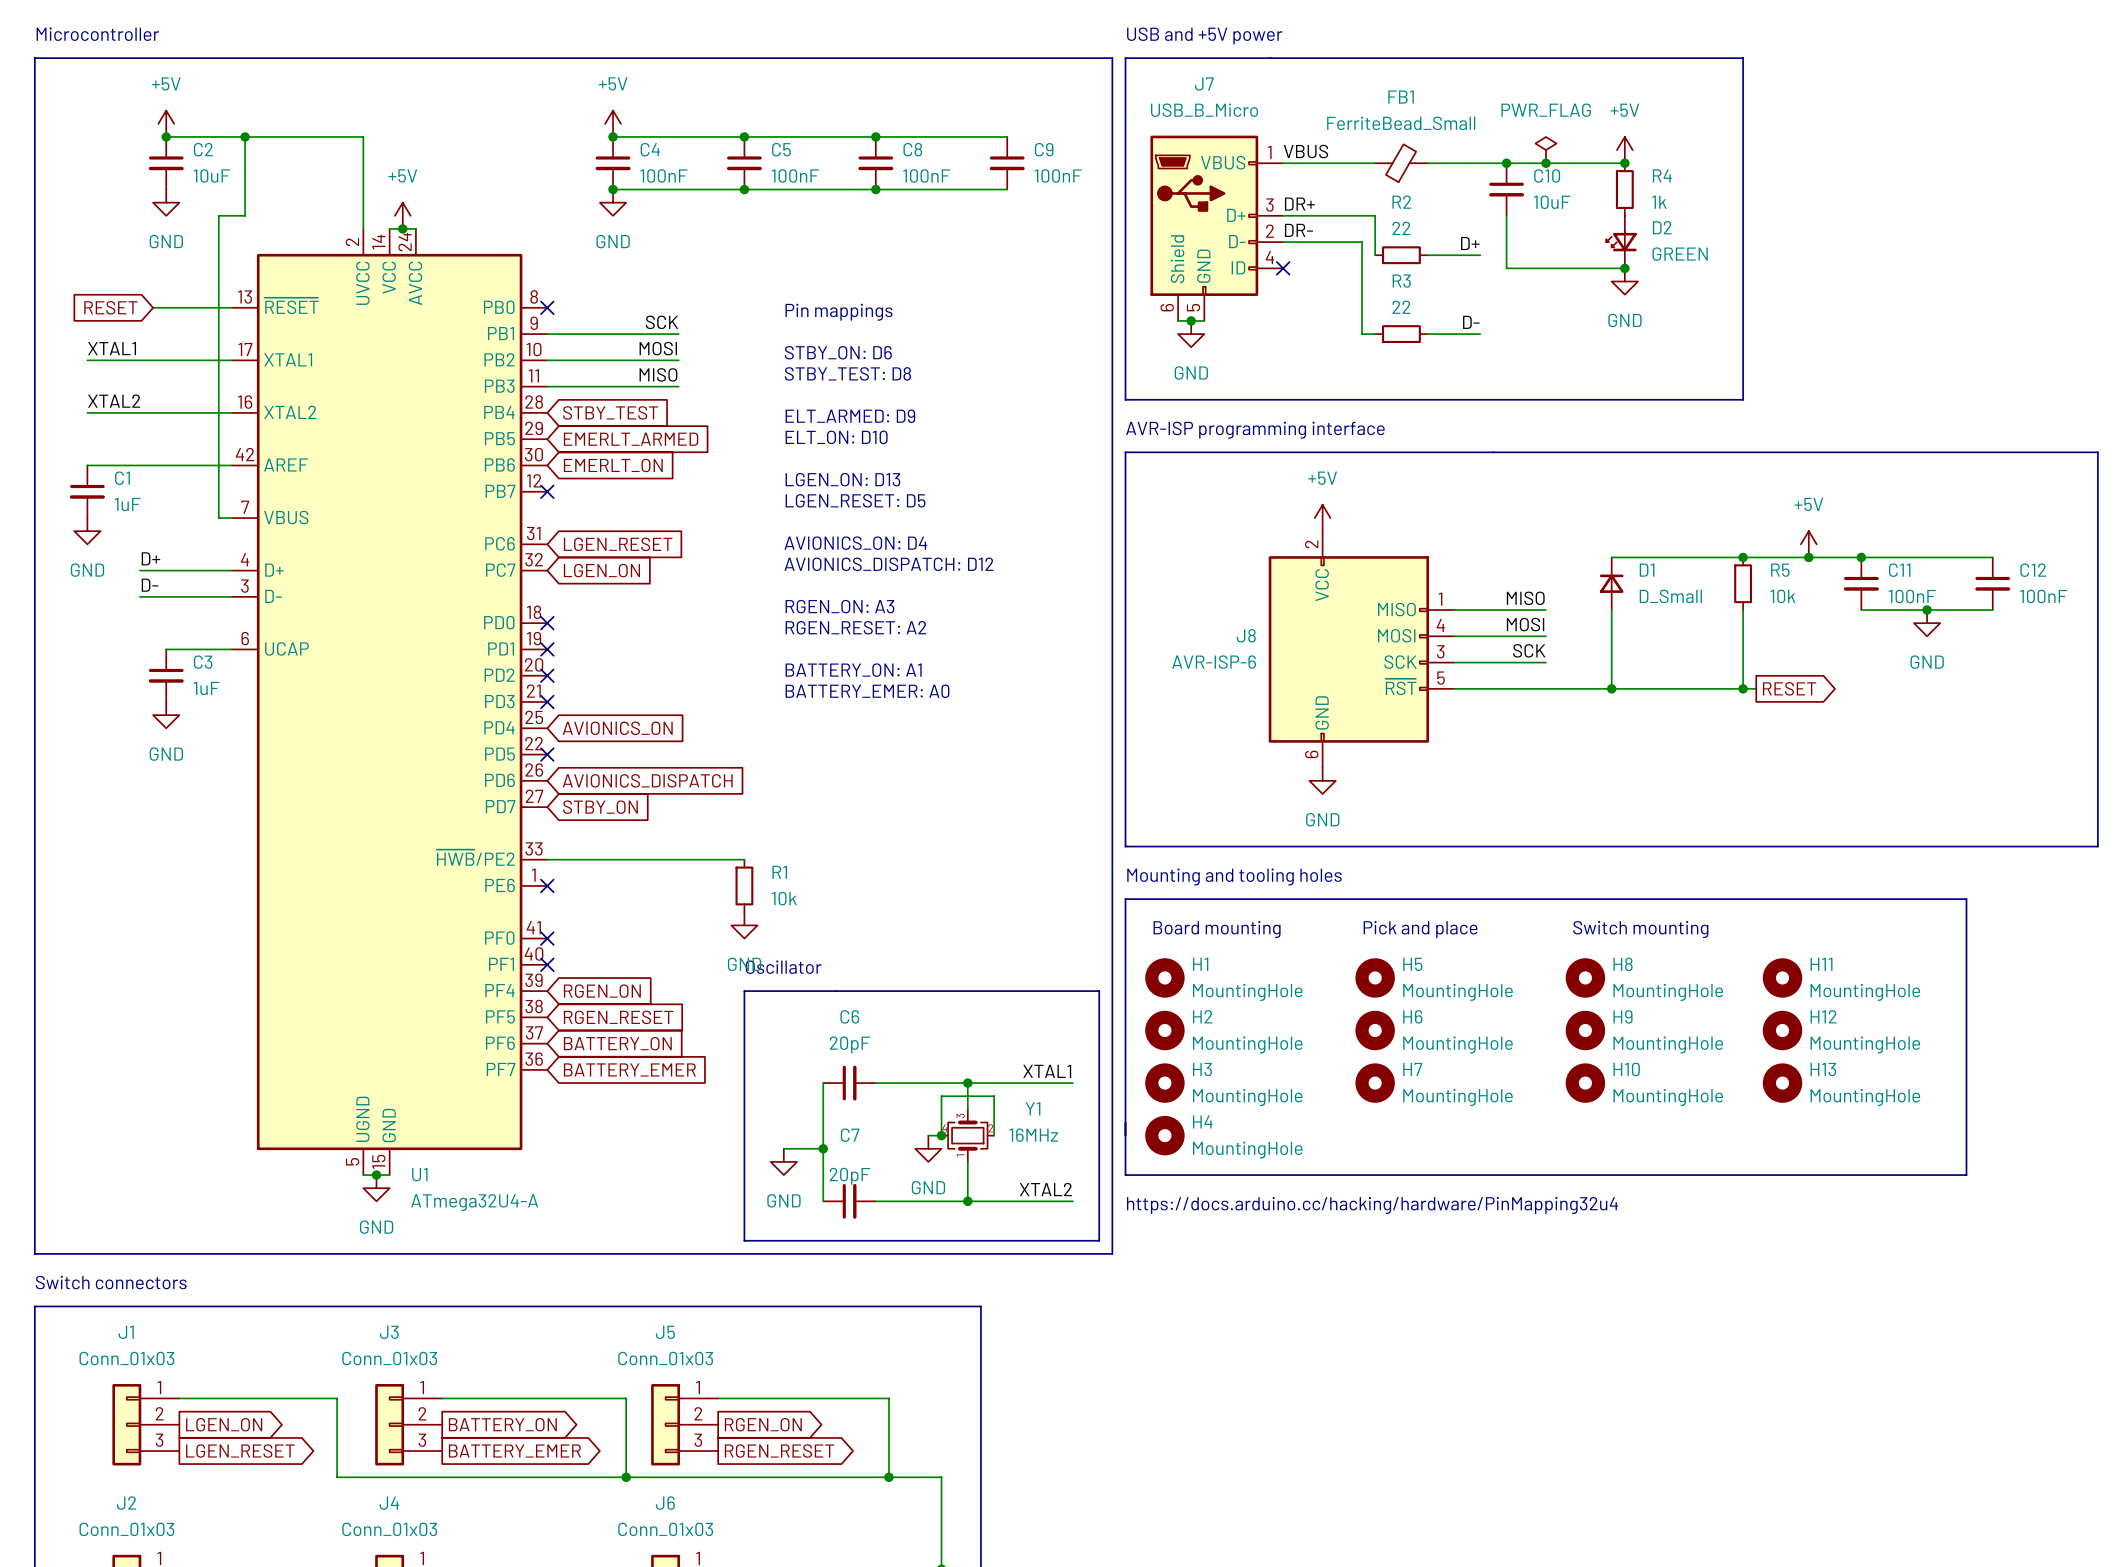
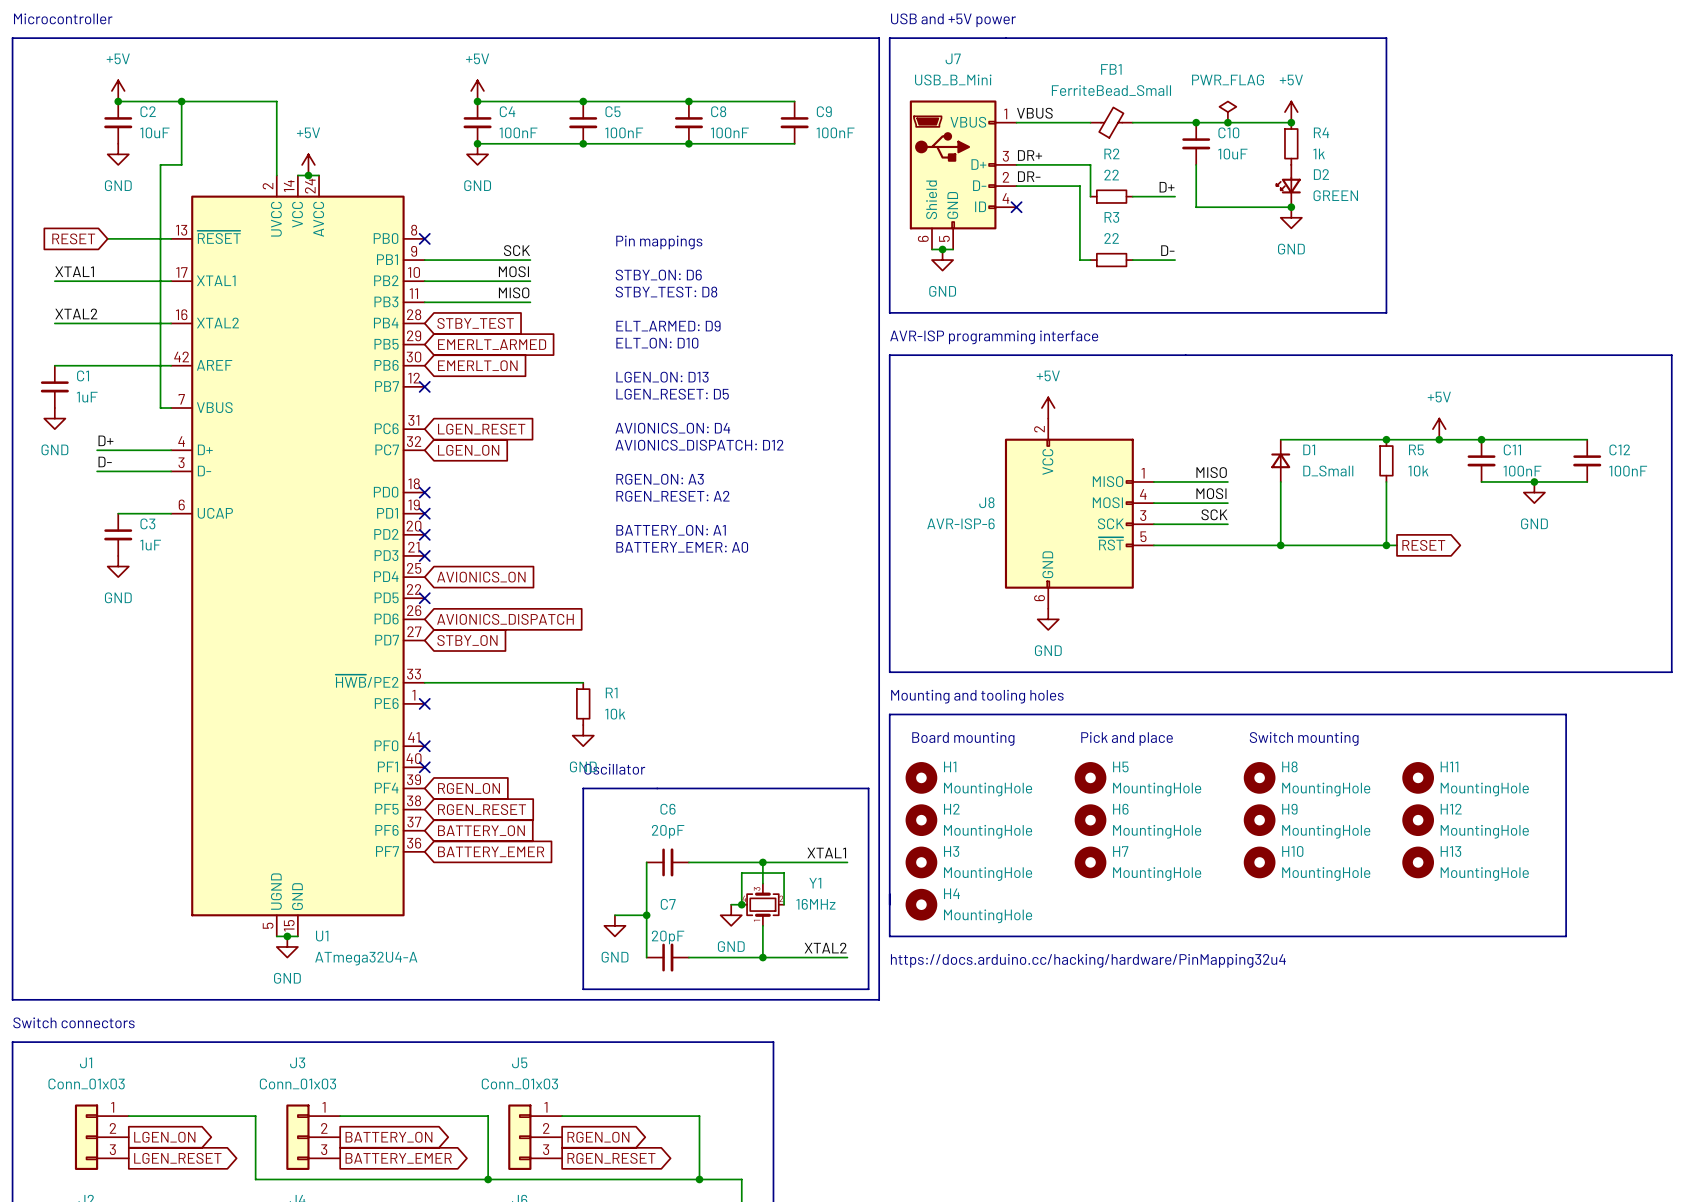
J7 value: USB_B_Micro (1204, 110) -> USB_B_Mini (953, 79)

